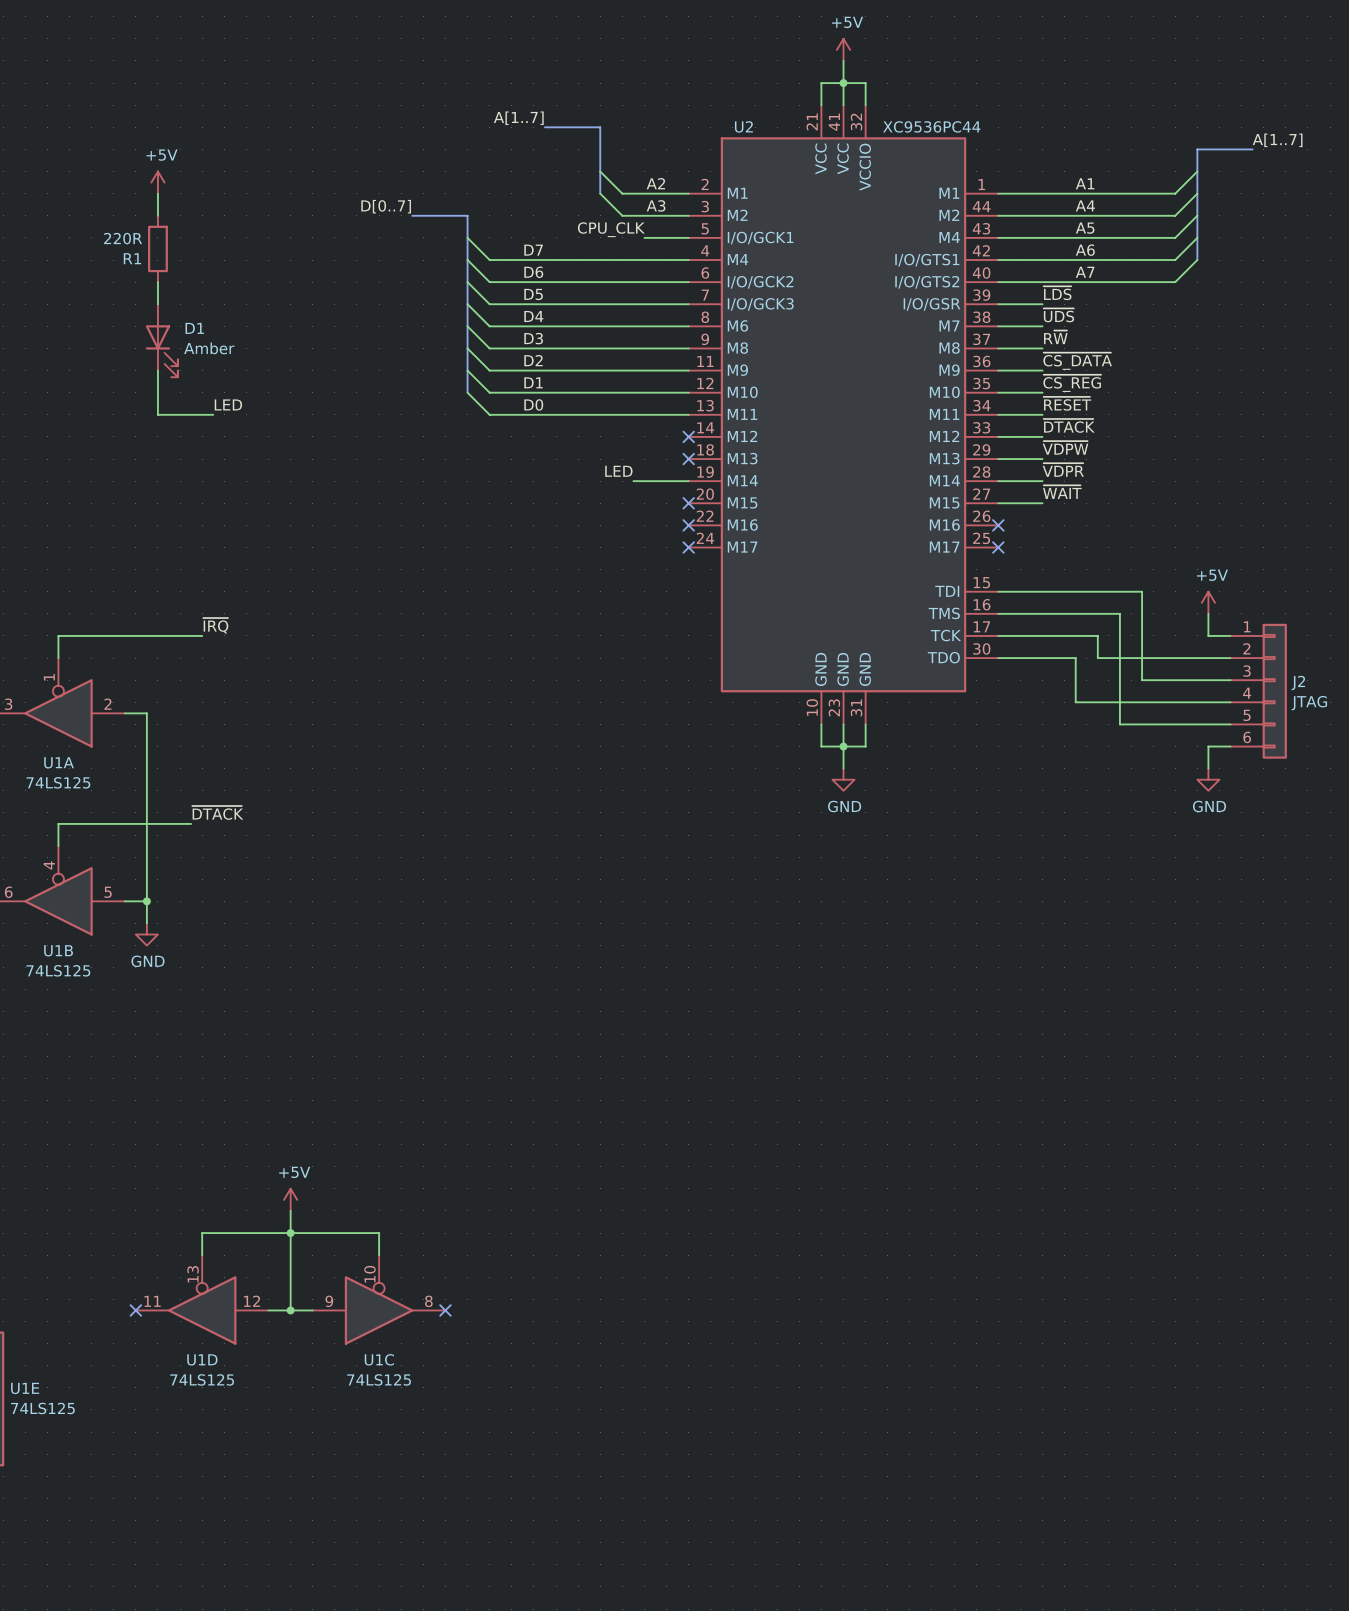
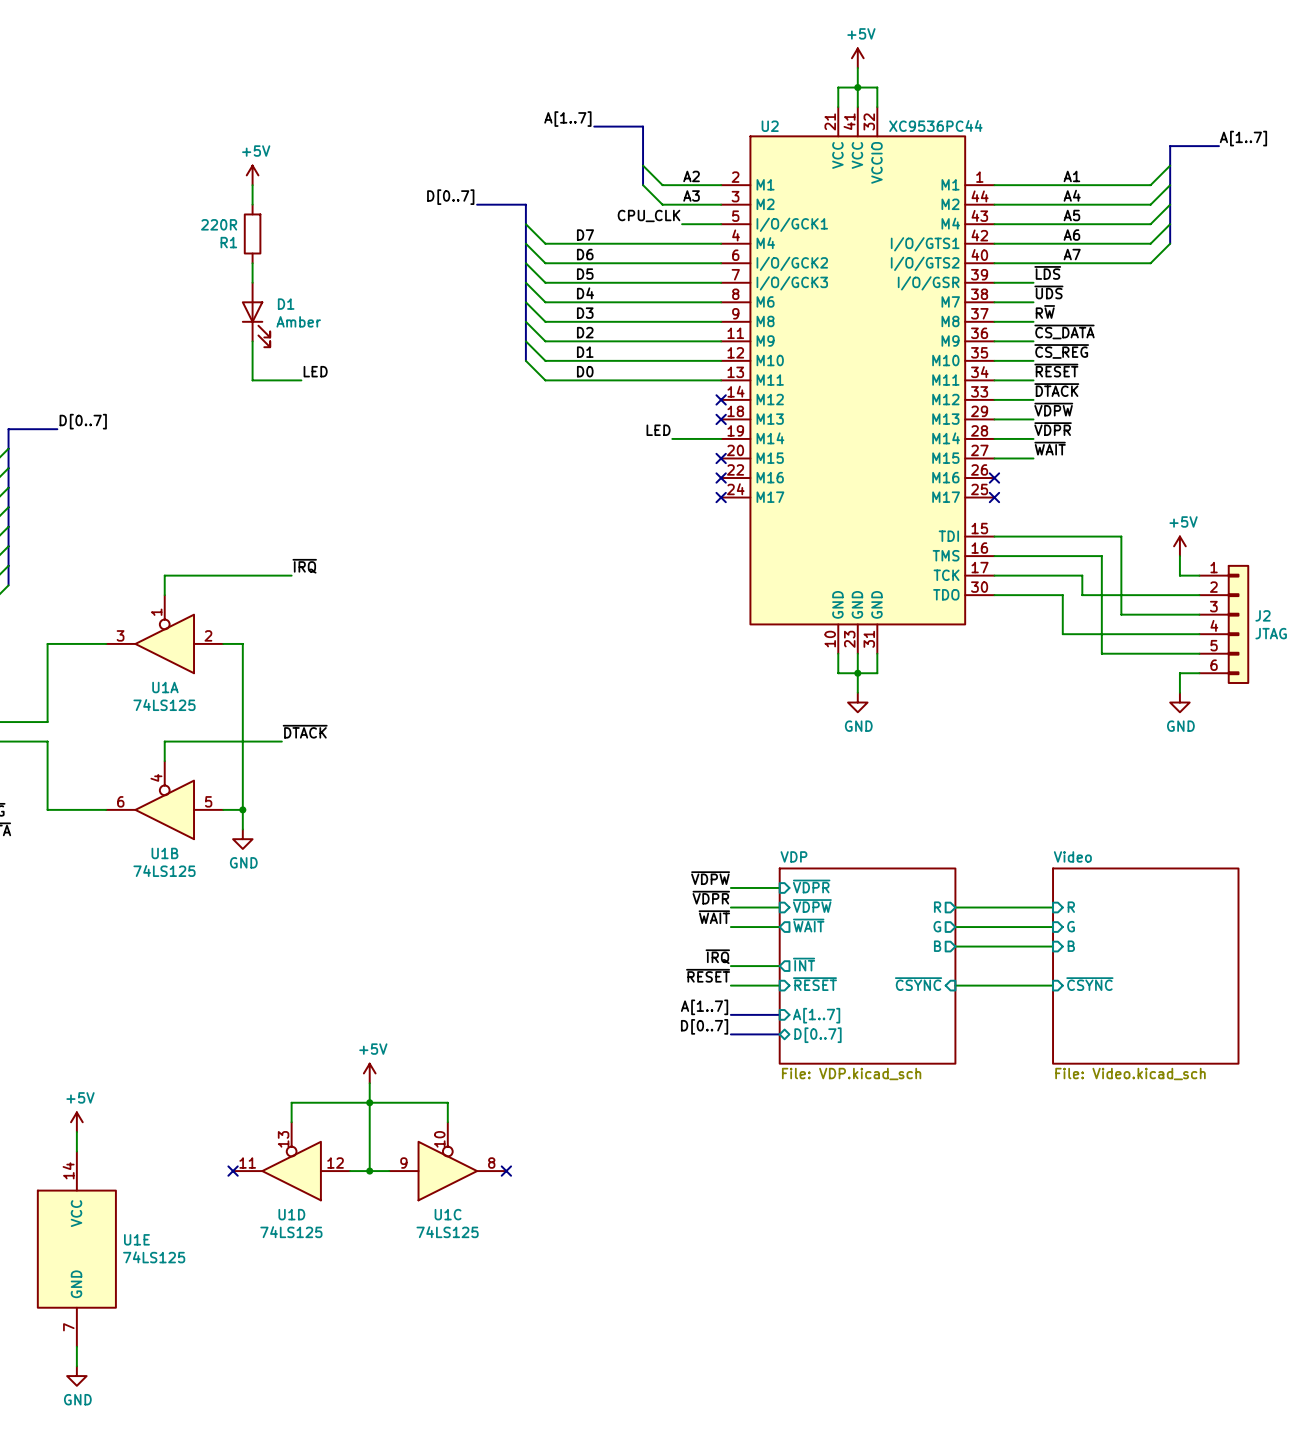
label: none -> ~{VDPW} (710, 878)
sheet pin: none -> ~{VDPR} (811, 886)
wire: none -> (730, 887) (779, 887)
label: none -> ~{VDPR} (711, 897)
sheet pin: none -> ~{VDPW} (812, 906)
wire: none -> (730, 907) (779, 907)
sheet pin: none -> R (937, 907)
wire: none -> (955, 907) (1053, 907)
sheet pin: none -> R (1071, 907)
label: none -> ~{WAIT} (714, 917)
sheet pin: none -> ~{WAIT} (808, 925)
sheet pin: none -> G (937, 926)
sheet pin: none -> G (1071, 926)
wire: none -> (730, 927) (779, 927)
wire: none -> (955, 927) (1053, 927)
sheet pin: none -> B (937, 946)
sheet pin: none -> B (1071, 946)
wire: none -> (955, 946) (1053, 946)
label: none -> ~{IRQ} (717, 956)
sheet pin: none -> ~{INT} (804, 964)
wire: none -> (730, 966) (779, 966)
sheet VDP: none -> File: VDP.kicad_sch (867, 966)
sheet Video: none -> File: Video.kicad_sch (1145, 966)
label: none -> ~{RESET} (708, 975)
sheet pin: none -> ~{RESET} (814, 984)
sheet pin: none -> ~{CSYNC} (918, 984)
sheet pin: none -> ~{CSYNC} (1089, 984)
wire: none -> (730, 985) (779, 985)
wire: none -> (955, 985) (1053, 985)
label: none -> A[1..7] (704, 1007)
bus: none -> (730, 1014) (779, 1014)
sheet pin: none -> A[1..7] (816, 1015)
label: none -> D[0..7] (704, 1026)
bus: none -> (730, 1034) (779, 1034)
sheet pin: none -> D[0..7] (817, 1035)

